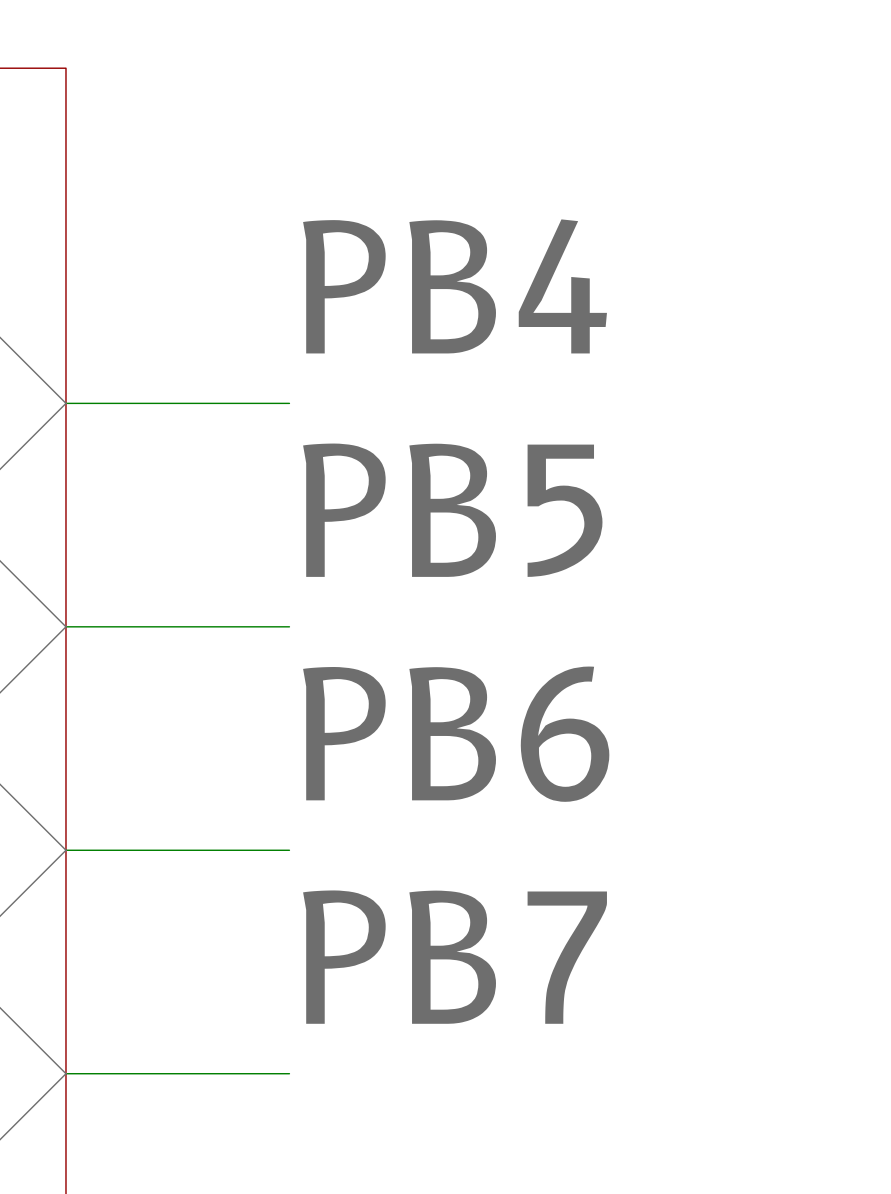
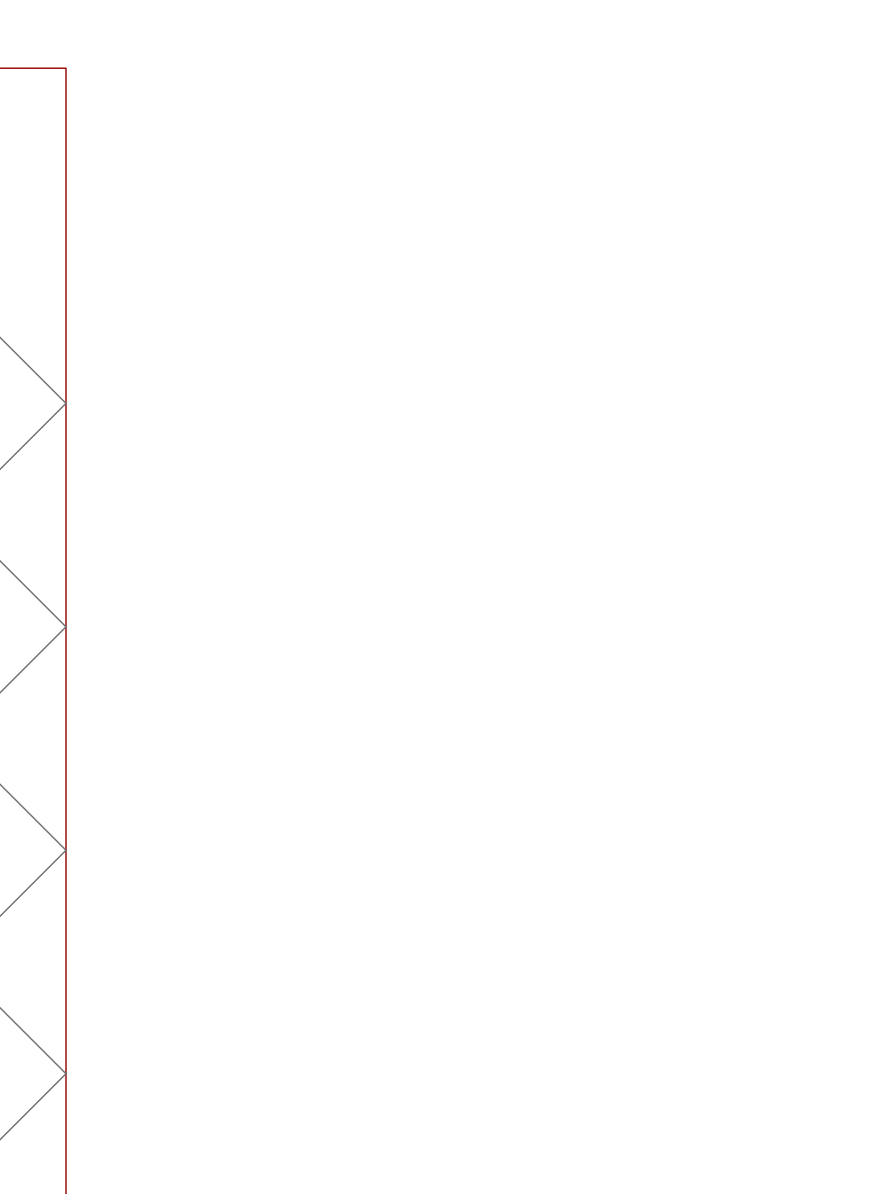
label: PB4 (455, 286) -> none
wire: (65, 403) (289, 403) -> none
label: PB5 (452, 510) -> none
wire: (65, 626) (289, 626) -> none
label: PB6 (456, 734) -> none
wire: (65, 850) (289, 850) -> none
label: PB7 (455, 957) -> none
wire: (65, 1073) (289, 1073) -> none

